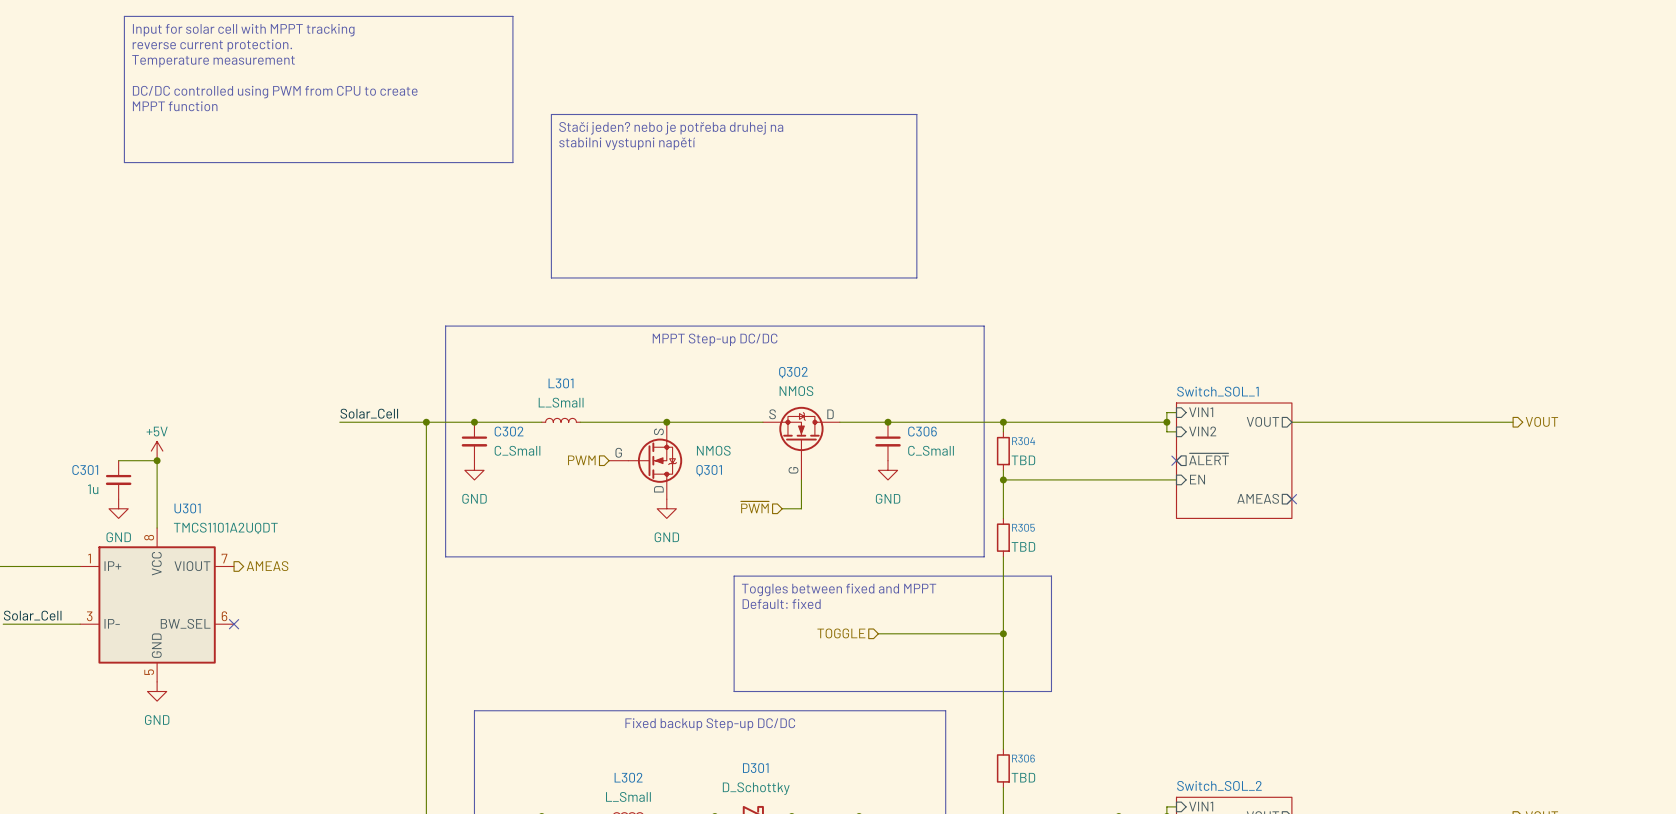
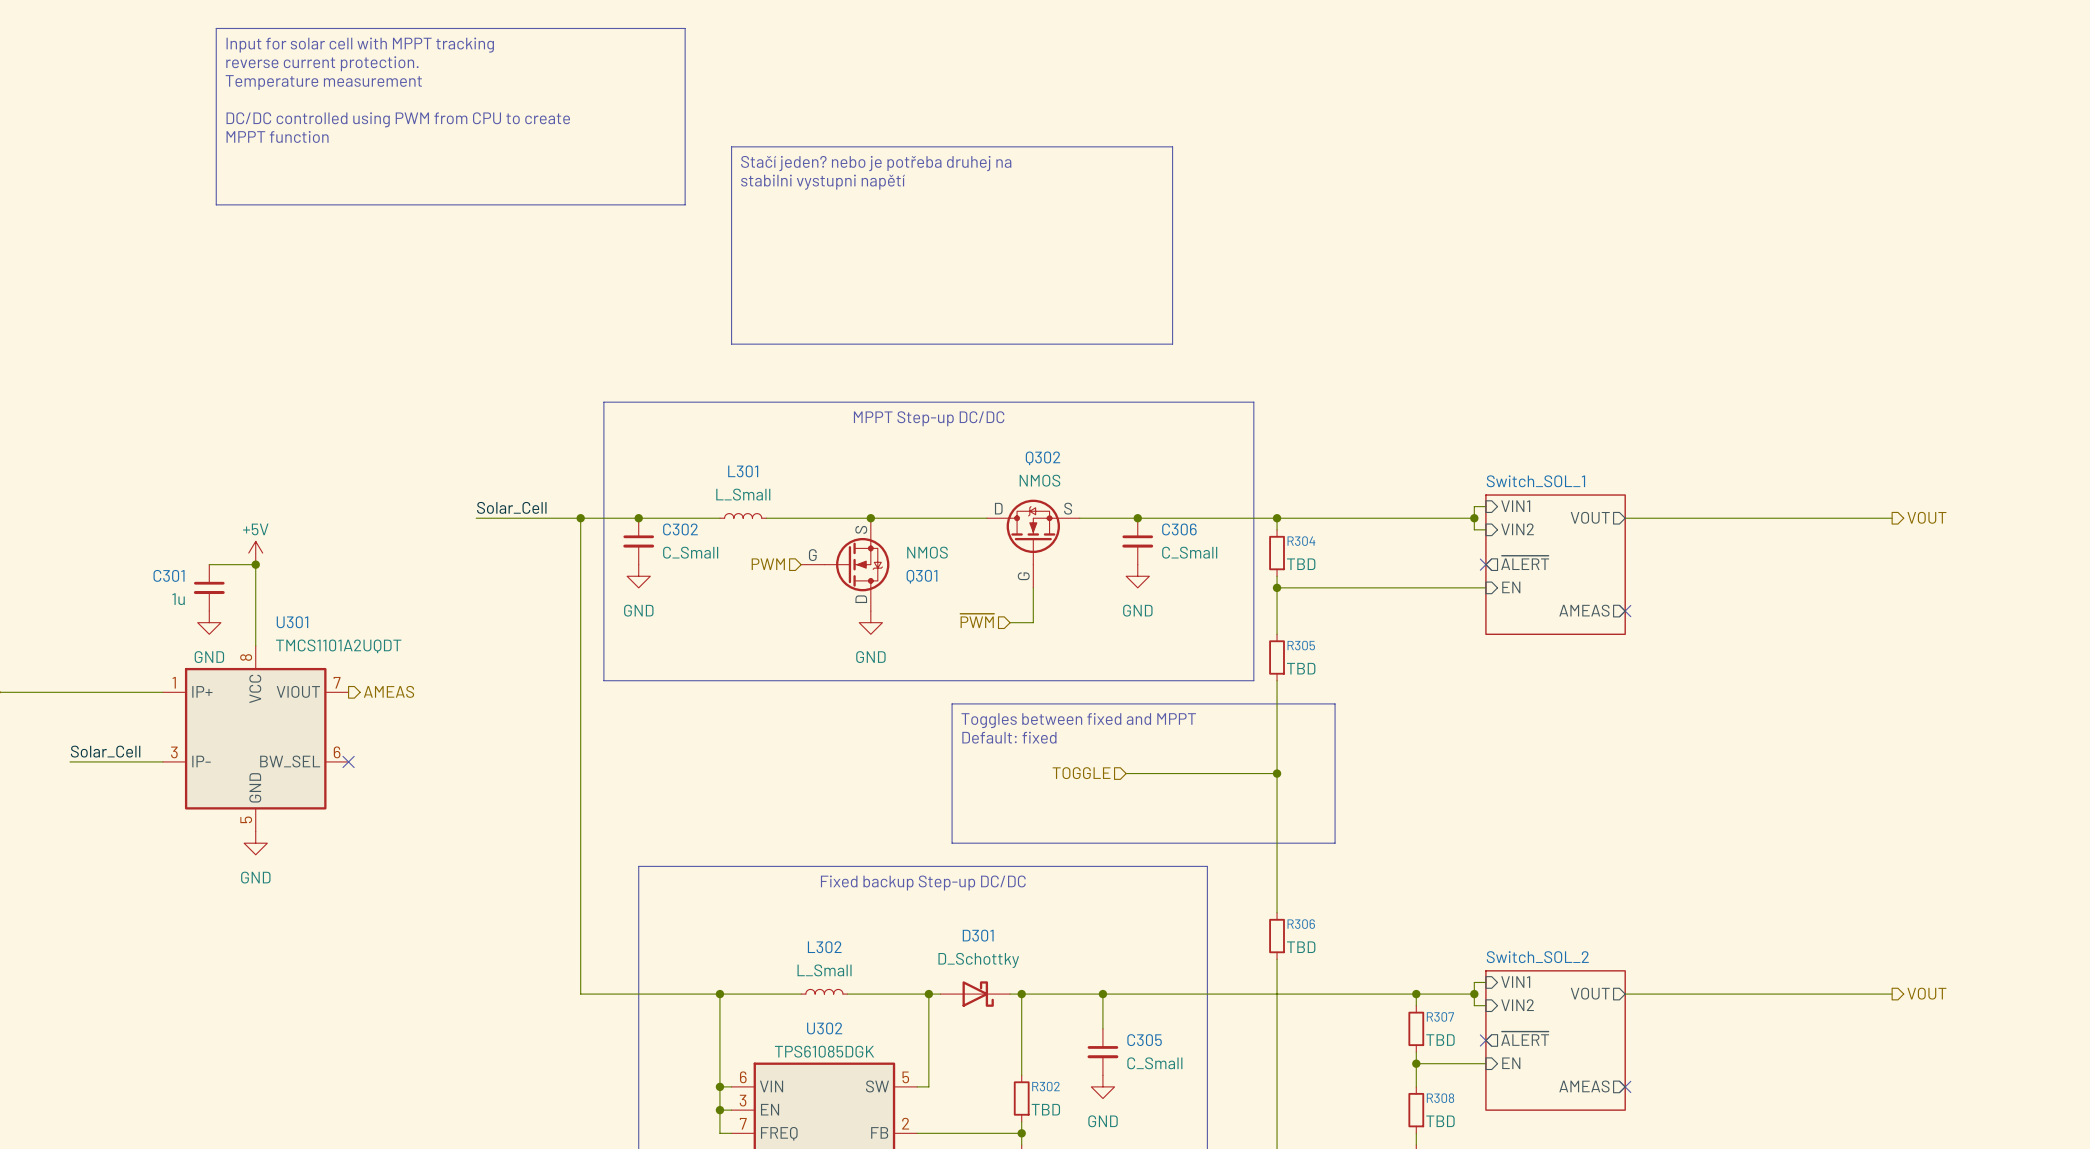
Q302 flip: as is (801, 433) -> left-right (1033, 532)

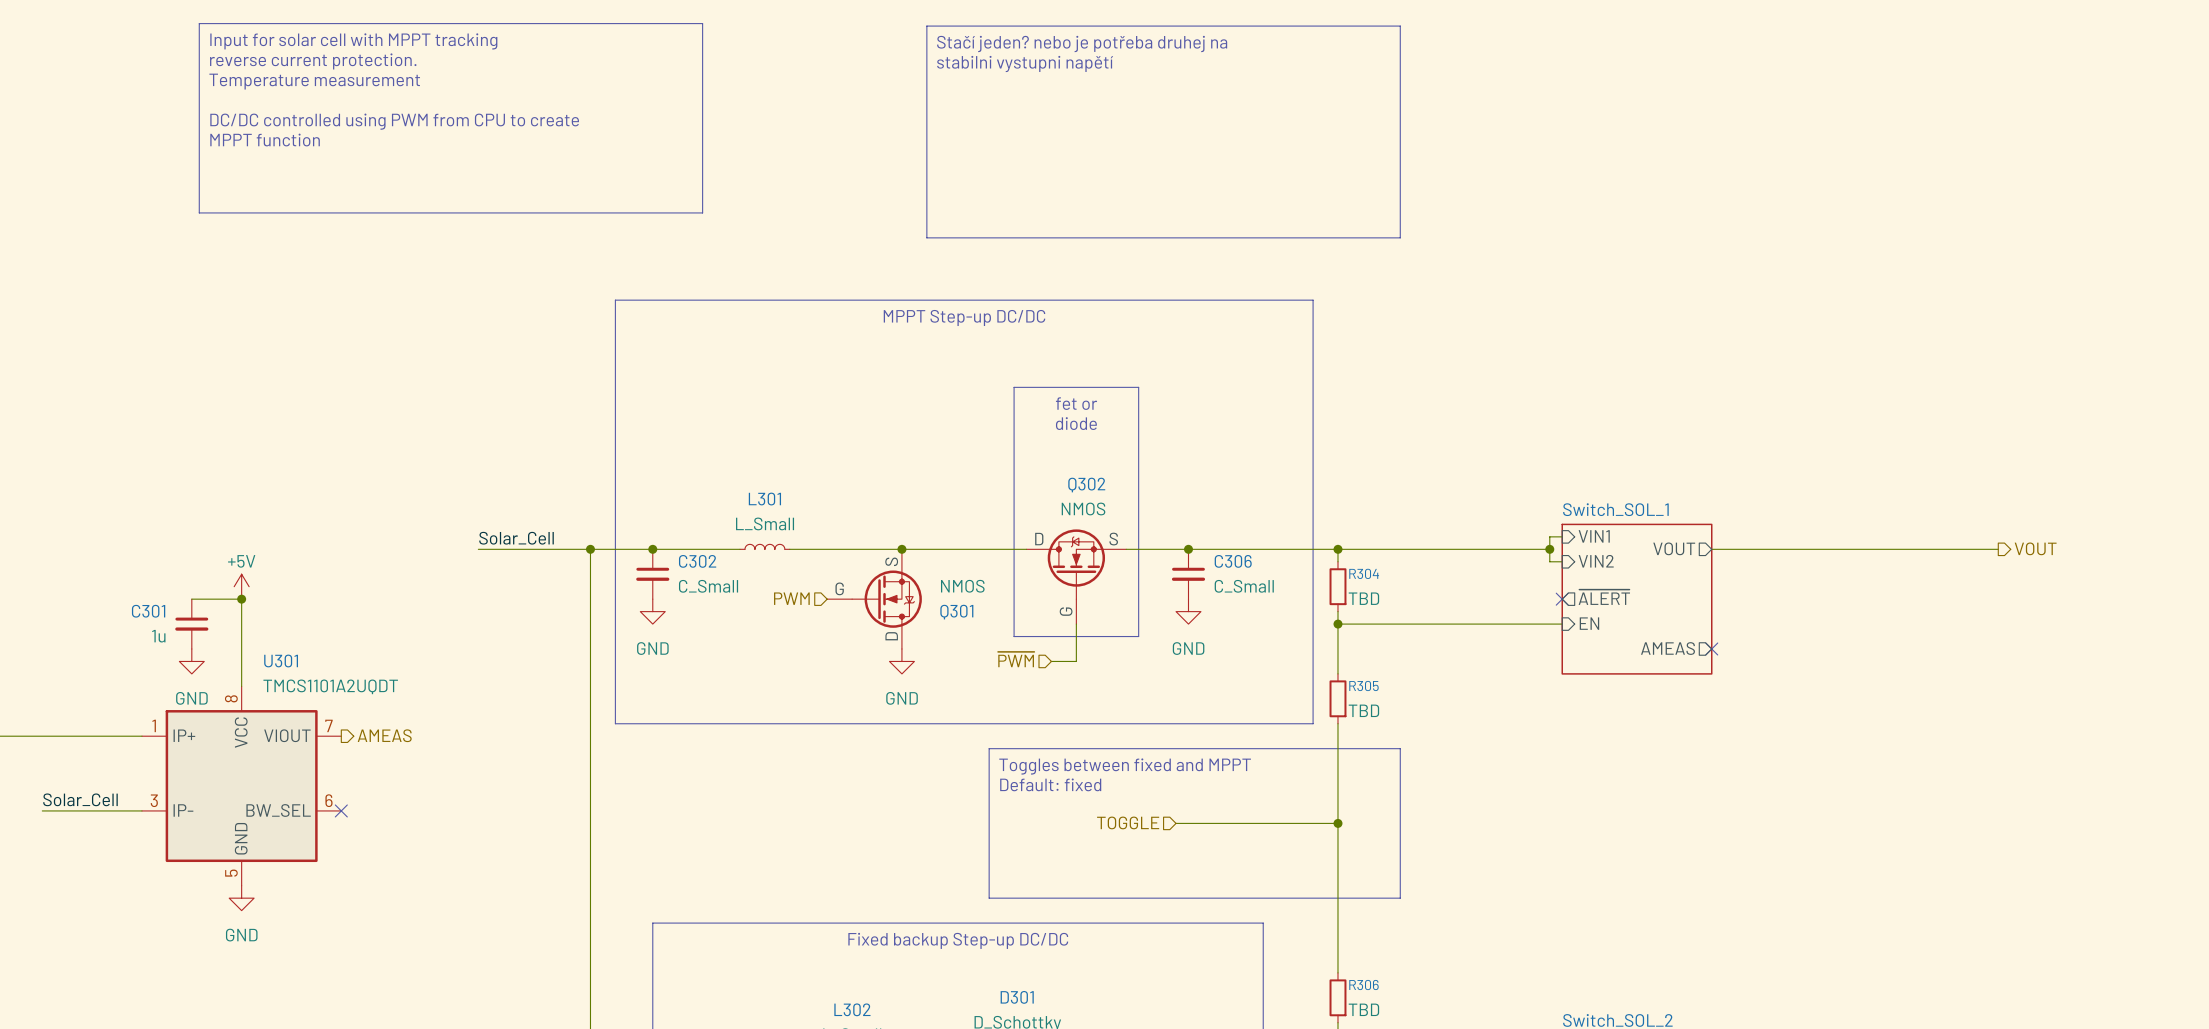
line: (731, 146) (1172, 146) (1172, 344) (731, 344) (731, 146) -> (926, 26) (1400, 26) (1400, 237) (926, 237) (926, 26)
text position: Stačí jeden? nebo je potřeba druhej na (876, 163) -> Stačí jeden? nebo je potřeba druhej na (1082, 44)
text position: stabilni vystupni napětí (823, 182) -> stabilni vystupni napětí (1025, 63)
line: none -> (1014, 387) (1138, 387) (1138, 636) (1014, 636) (1014, 387)
text: none -> fet or (1076, 403)
text: none -> diode (1076, 423)
line: (603, 402) (1253, 402) -> (615, 424) (615, 300) (1313, 300) (1313, 424)
text position: MPPT Step-up DC/DC (929, 418) -> MPPT Step-up DC/DC (964, 317)

